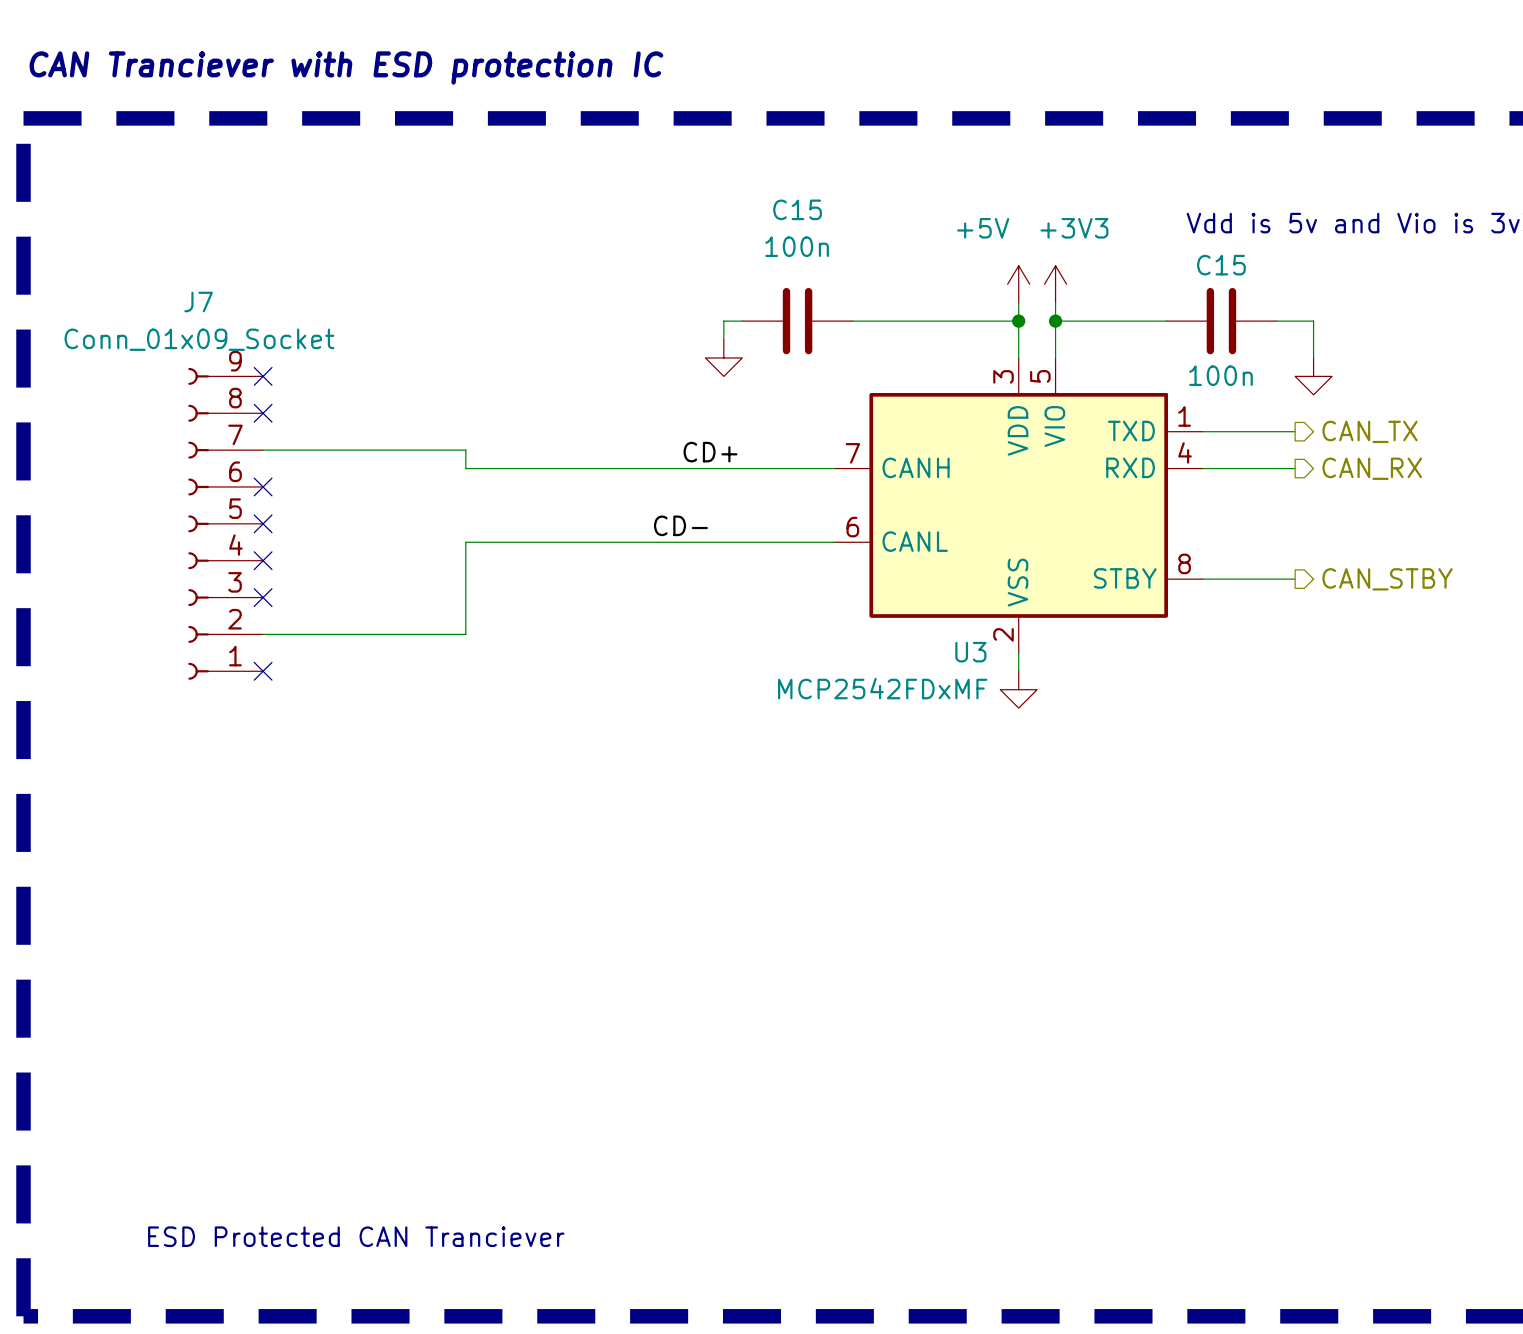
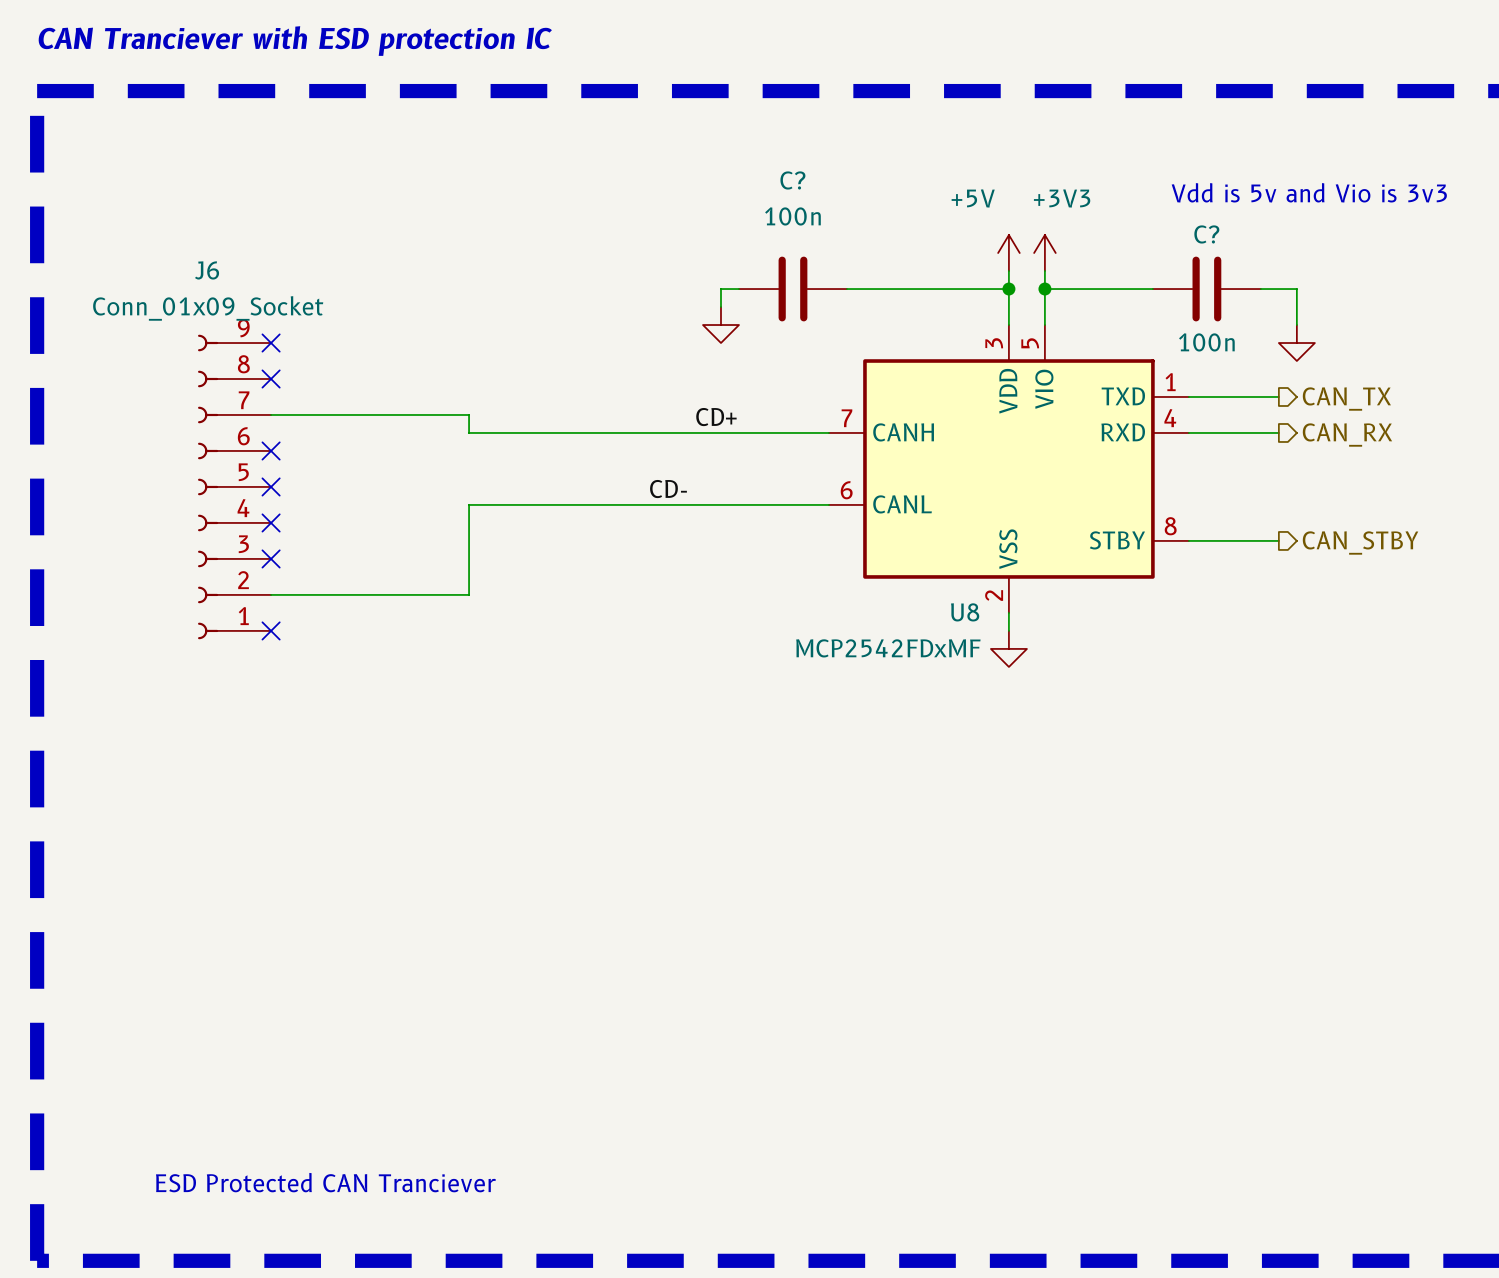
C15 name: C15 (797, 209) -> C? (792, 180)
C15 name: C15 (1221, 265) -> C? (1206, 234)
J7 name: J7 (198, 302) -> J6 (207, 270)
U3 name: U3 (970, 652) -> U8 (965, 612)

